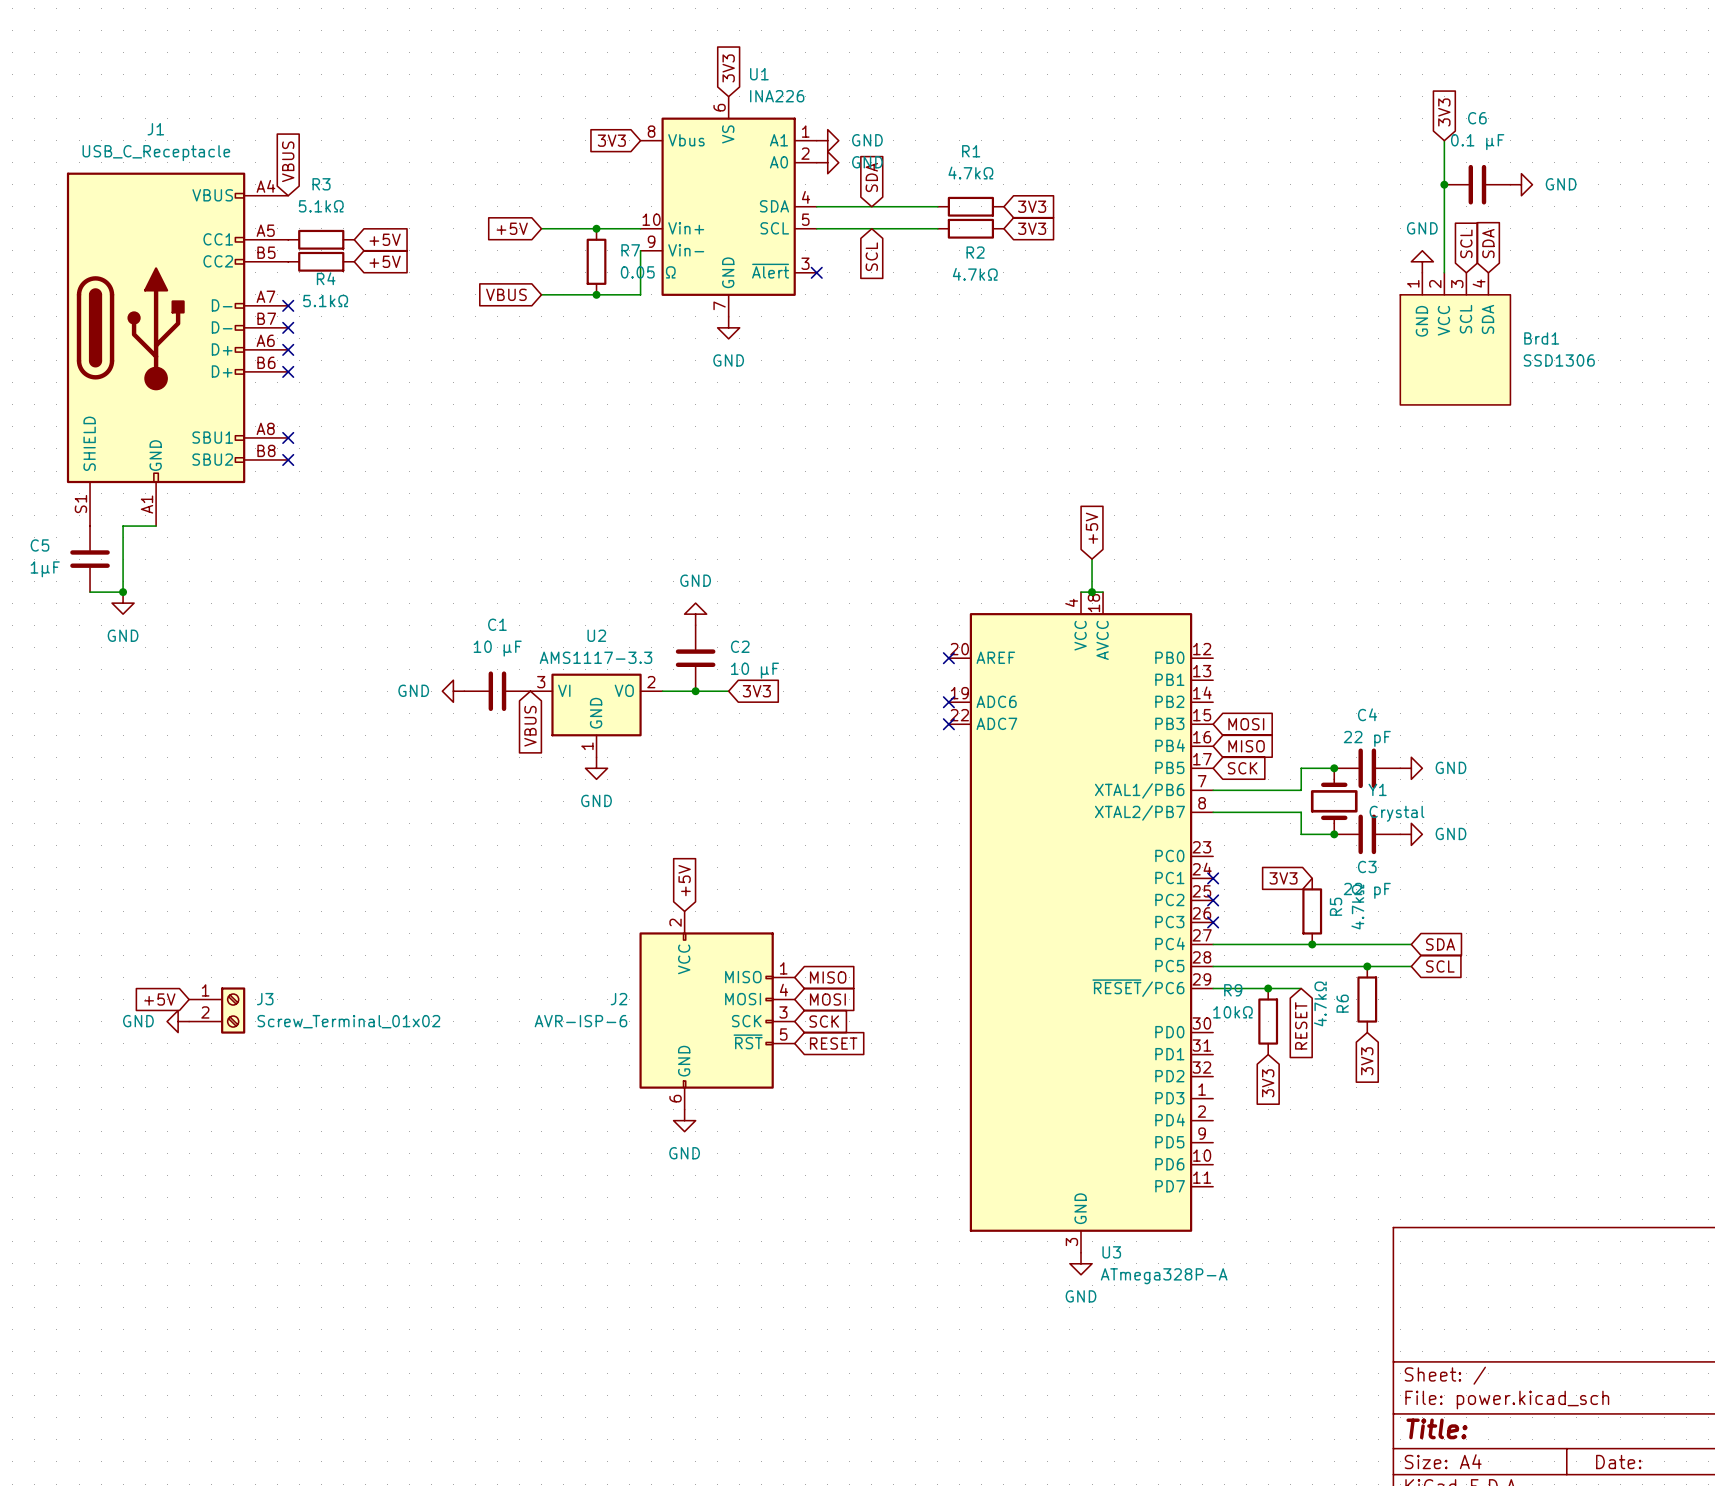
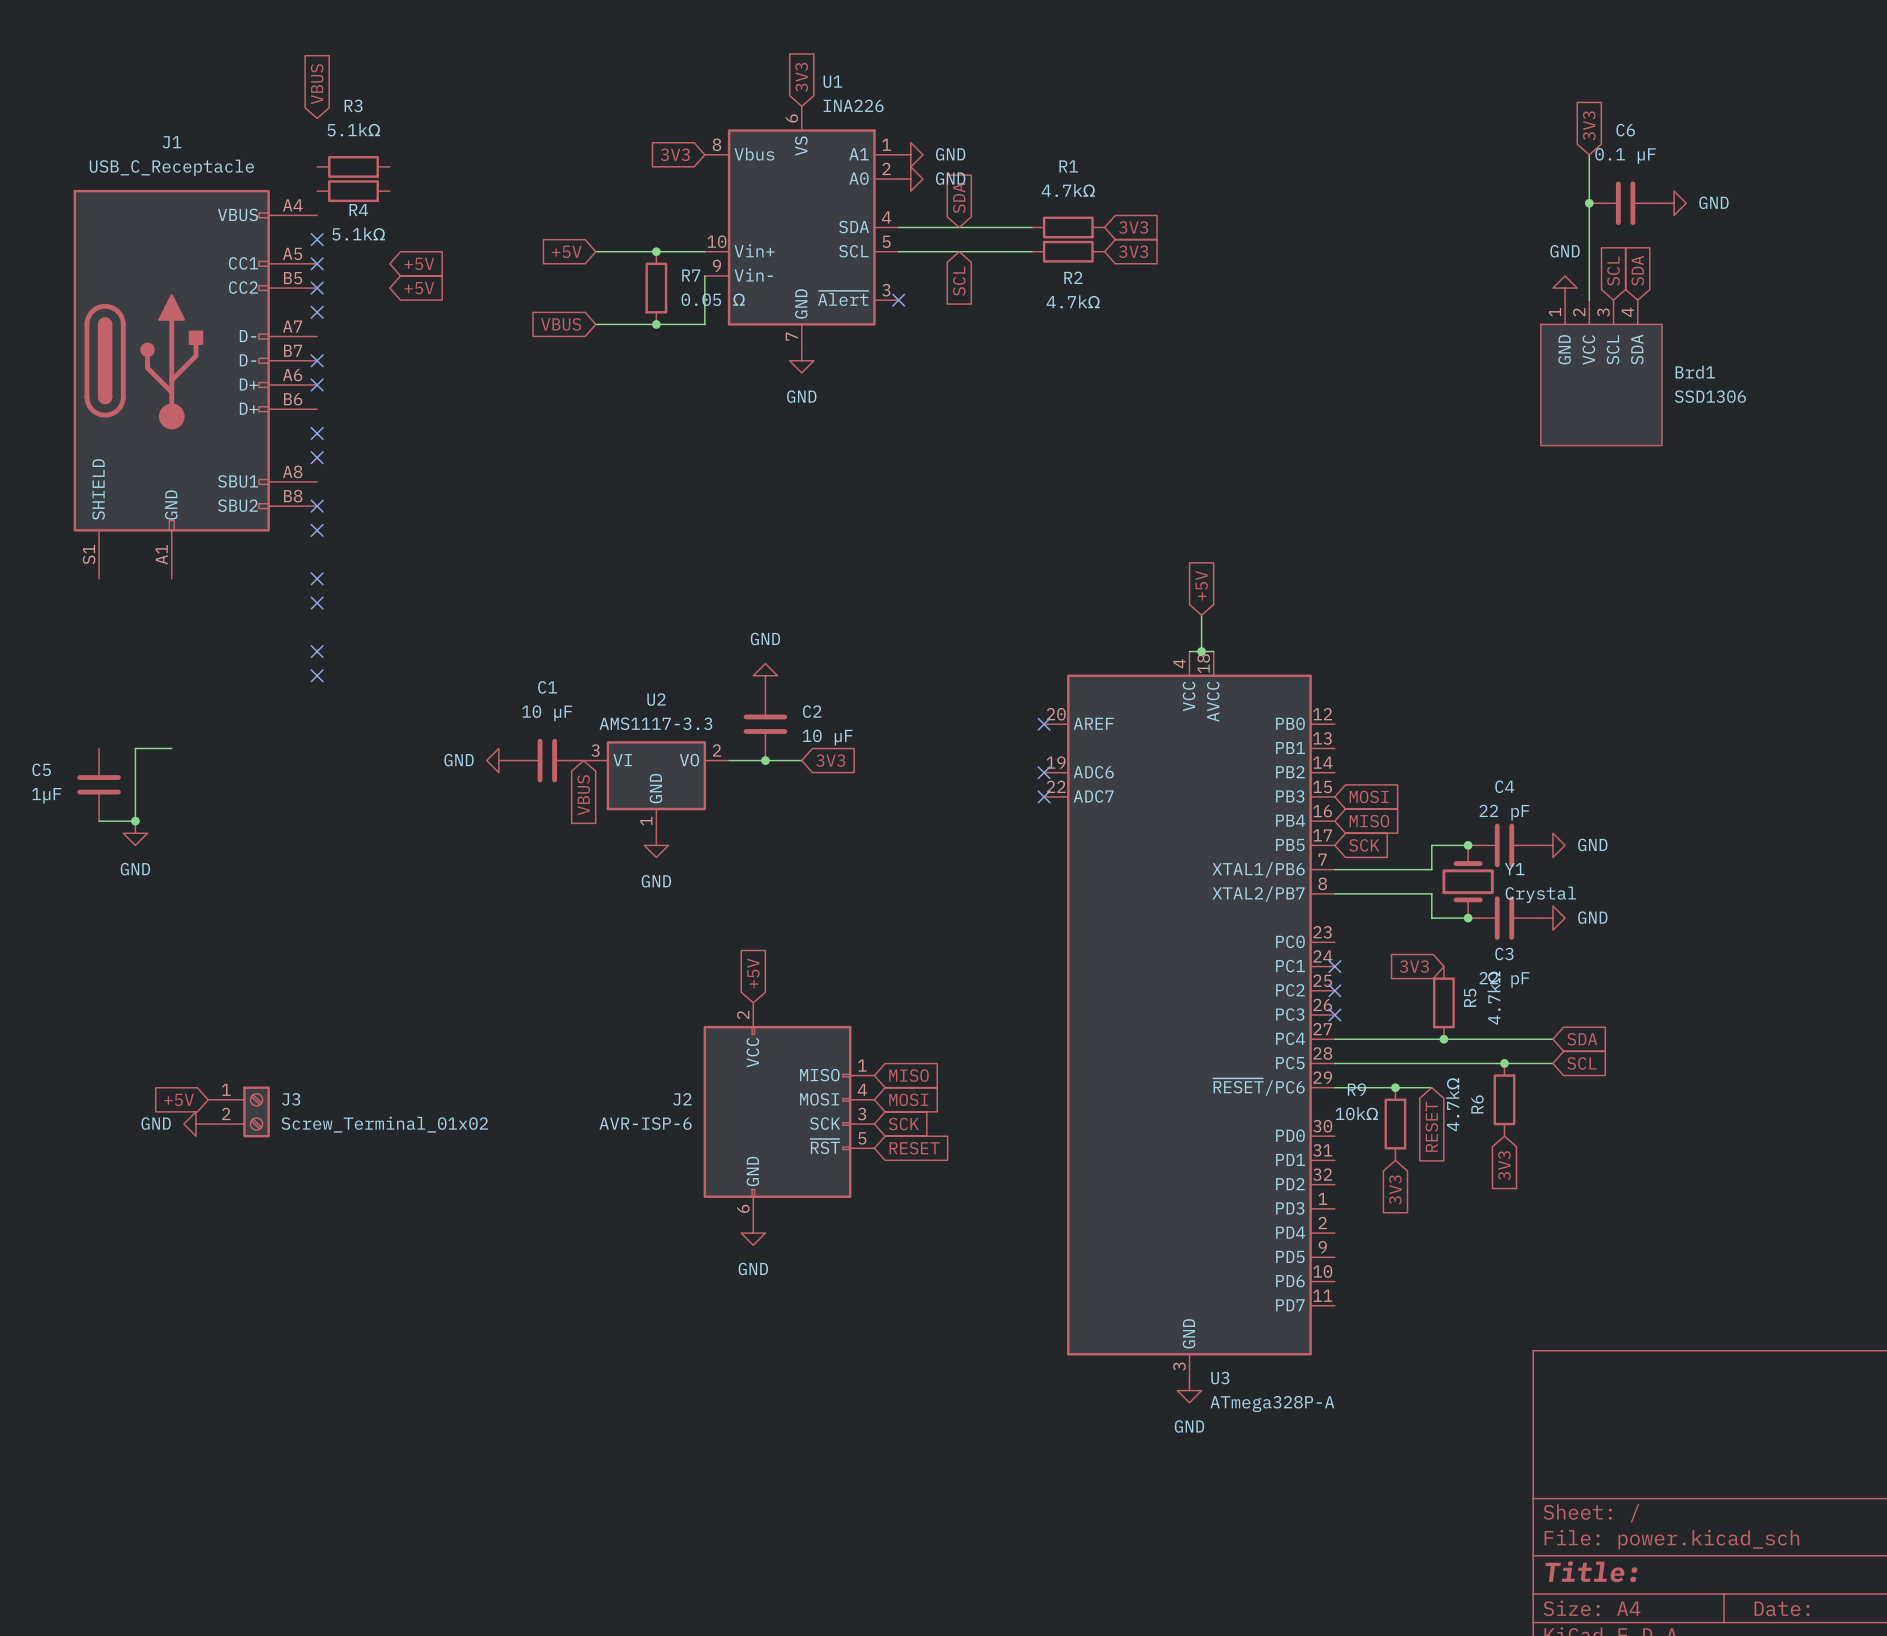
global label position: VBUS (288, 161) -> VBUS (317, 84)
no-connect mark: none -> (317, 239)
no-connect mark: none -> (317, 263)
R3 position: (321, 239) -> (353, 166)
no-connect mark: none -> (317, 288)
R4 position: (321, 261) -> (353, 191)
no-connect mark: none -> (317, 312)
no-connect mark: (288, 305) -> none
no-connect mark: (288, 371) -> none
no-connect mark: none -> (317, 433)
no-connect mark: none -> (317, 457)
no-connect mark: (288, 437) -> none
no-connect mark: none -> (317, 530)
wire: (156, 526) (123, 526) (123, 592) (90, 592) -> (171, 748) (135, 748) (135, 821) (99, 821)
no-connect mark: none -> (317, 578)
no-connect mark: none -> (317, 603)
C5 position: (90, 559) -> (99, 784)
junction: (123, 592) -> none
no-connect mark: none -> (317, 651)
power symbol position: GND (123, 603) -> GND (135, 833)
no-connect mark: none -> (317, 675)
junction: none -> (135, 821)

